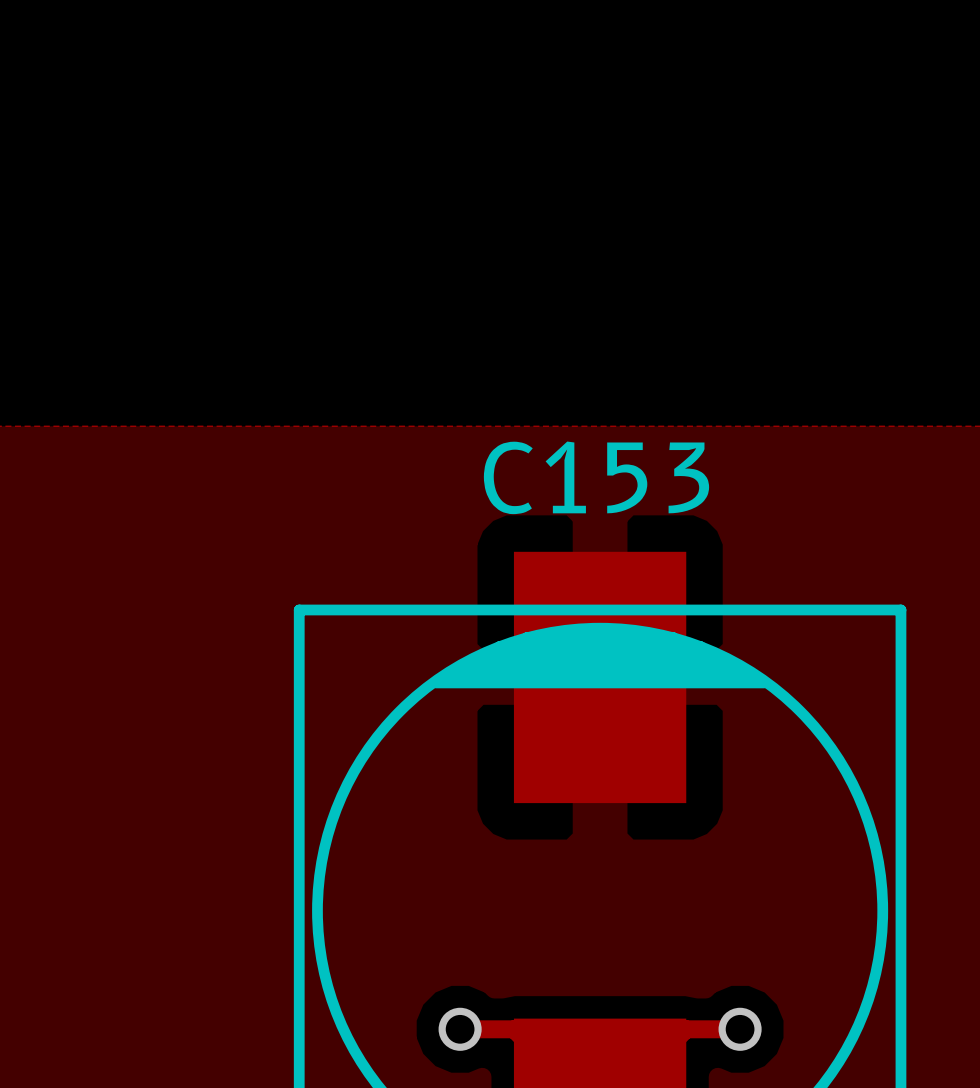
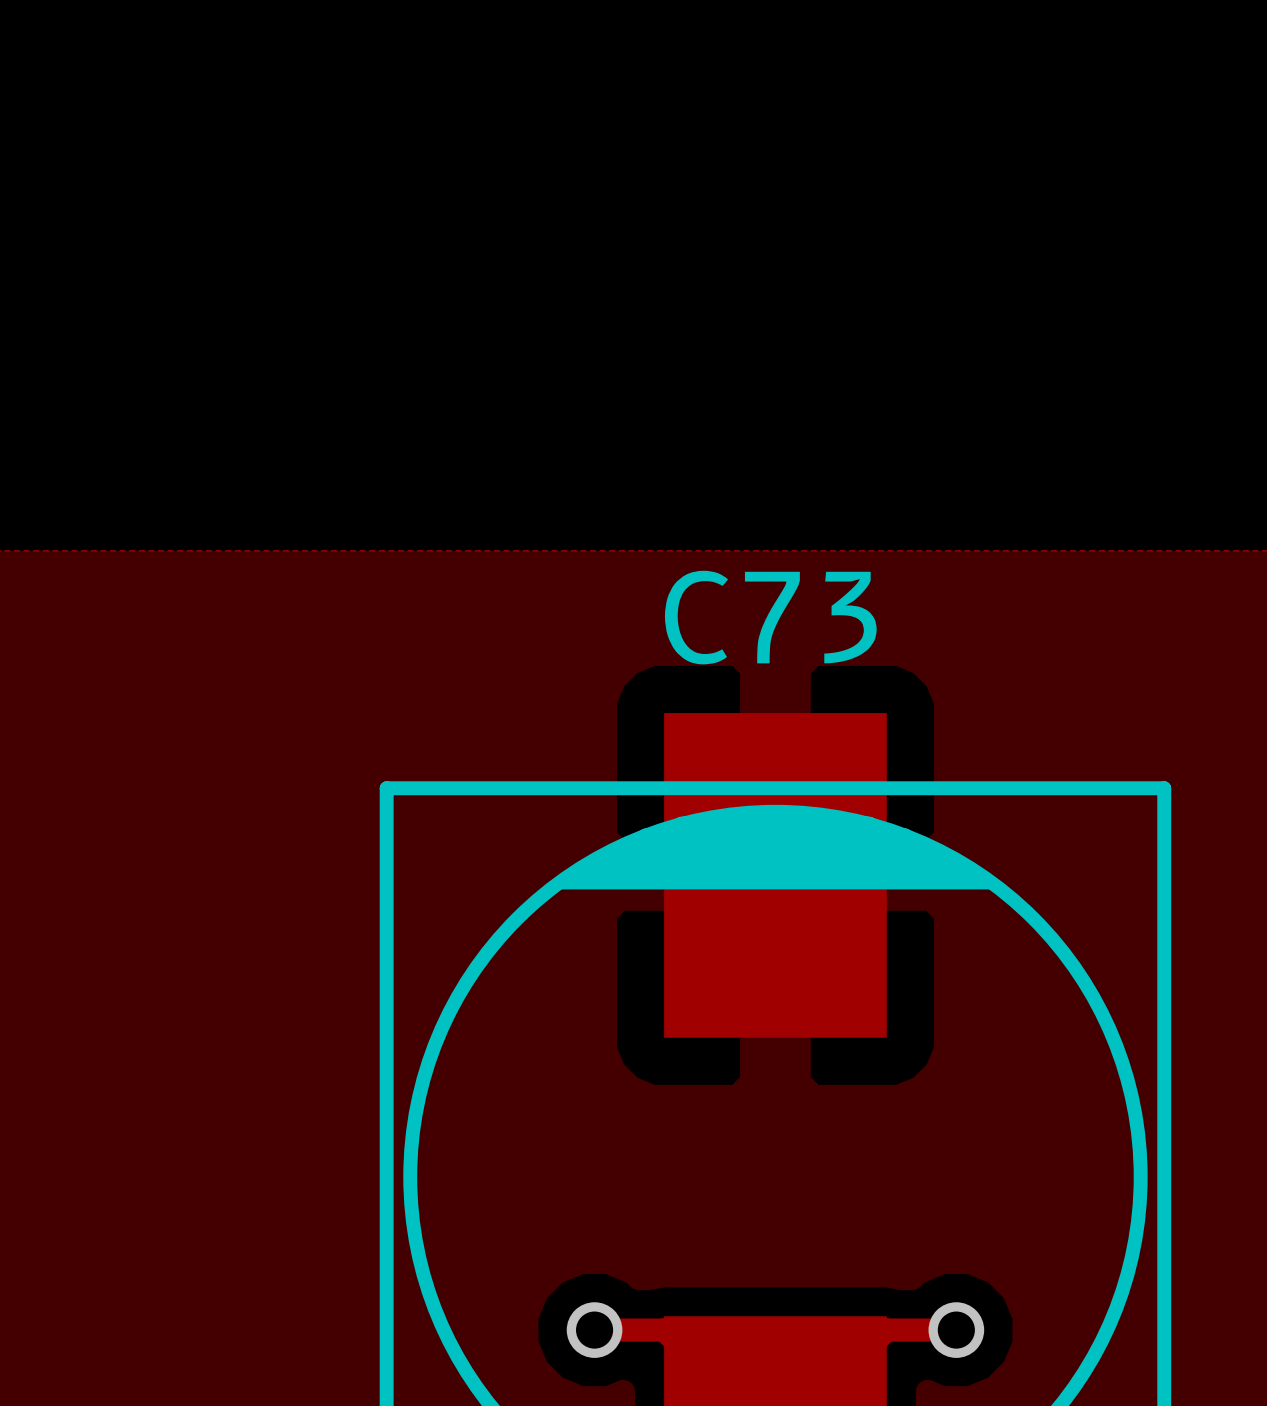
C153 name: C153 (596, 477) -> C73 (770, 617)

